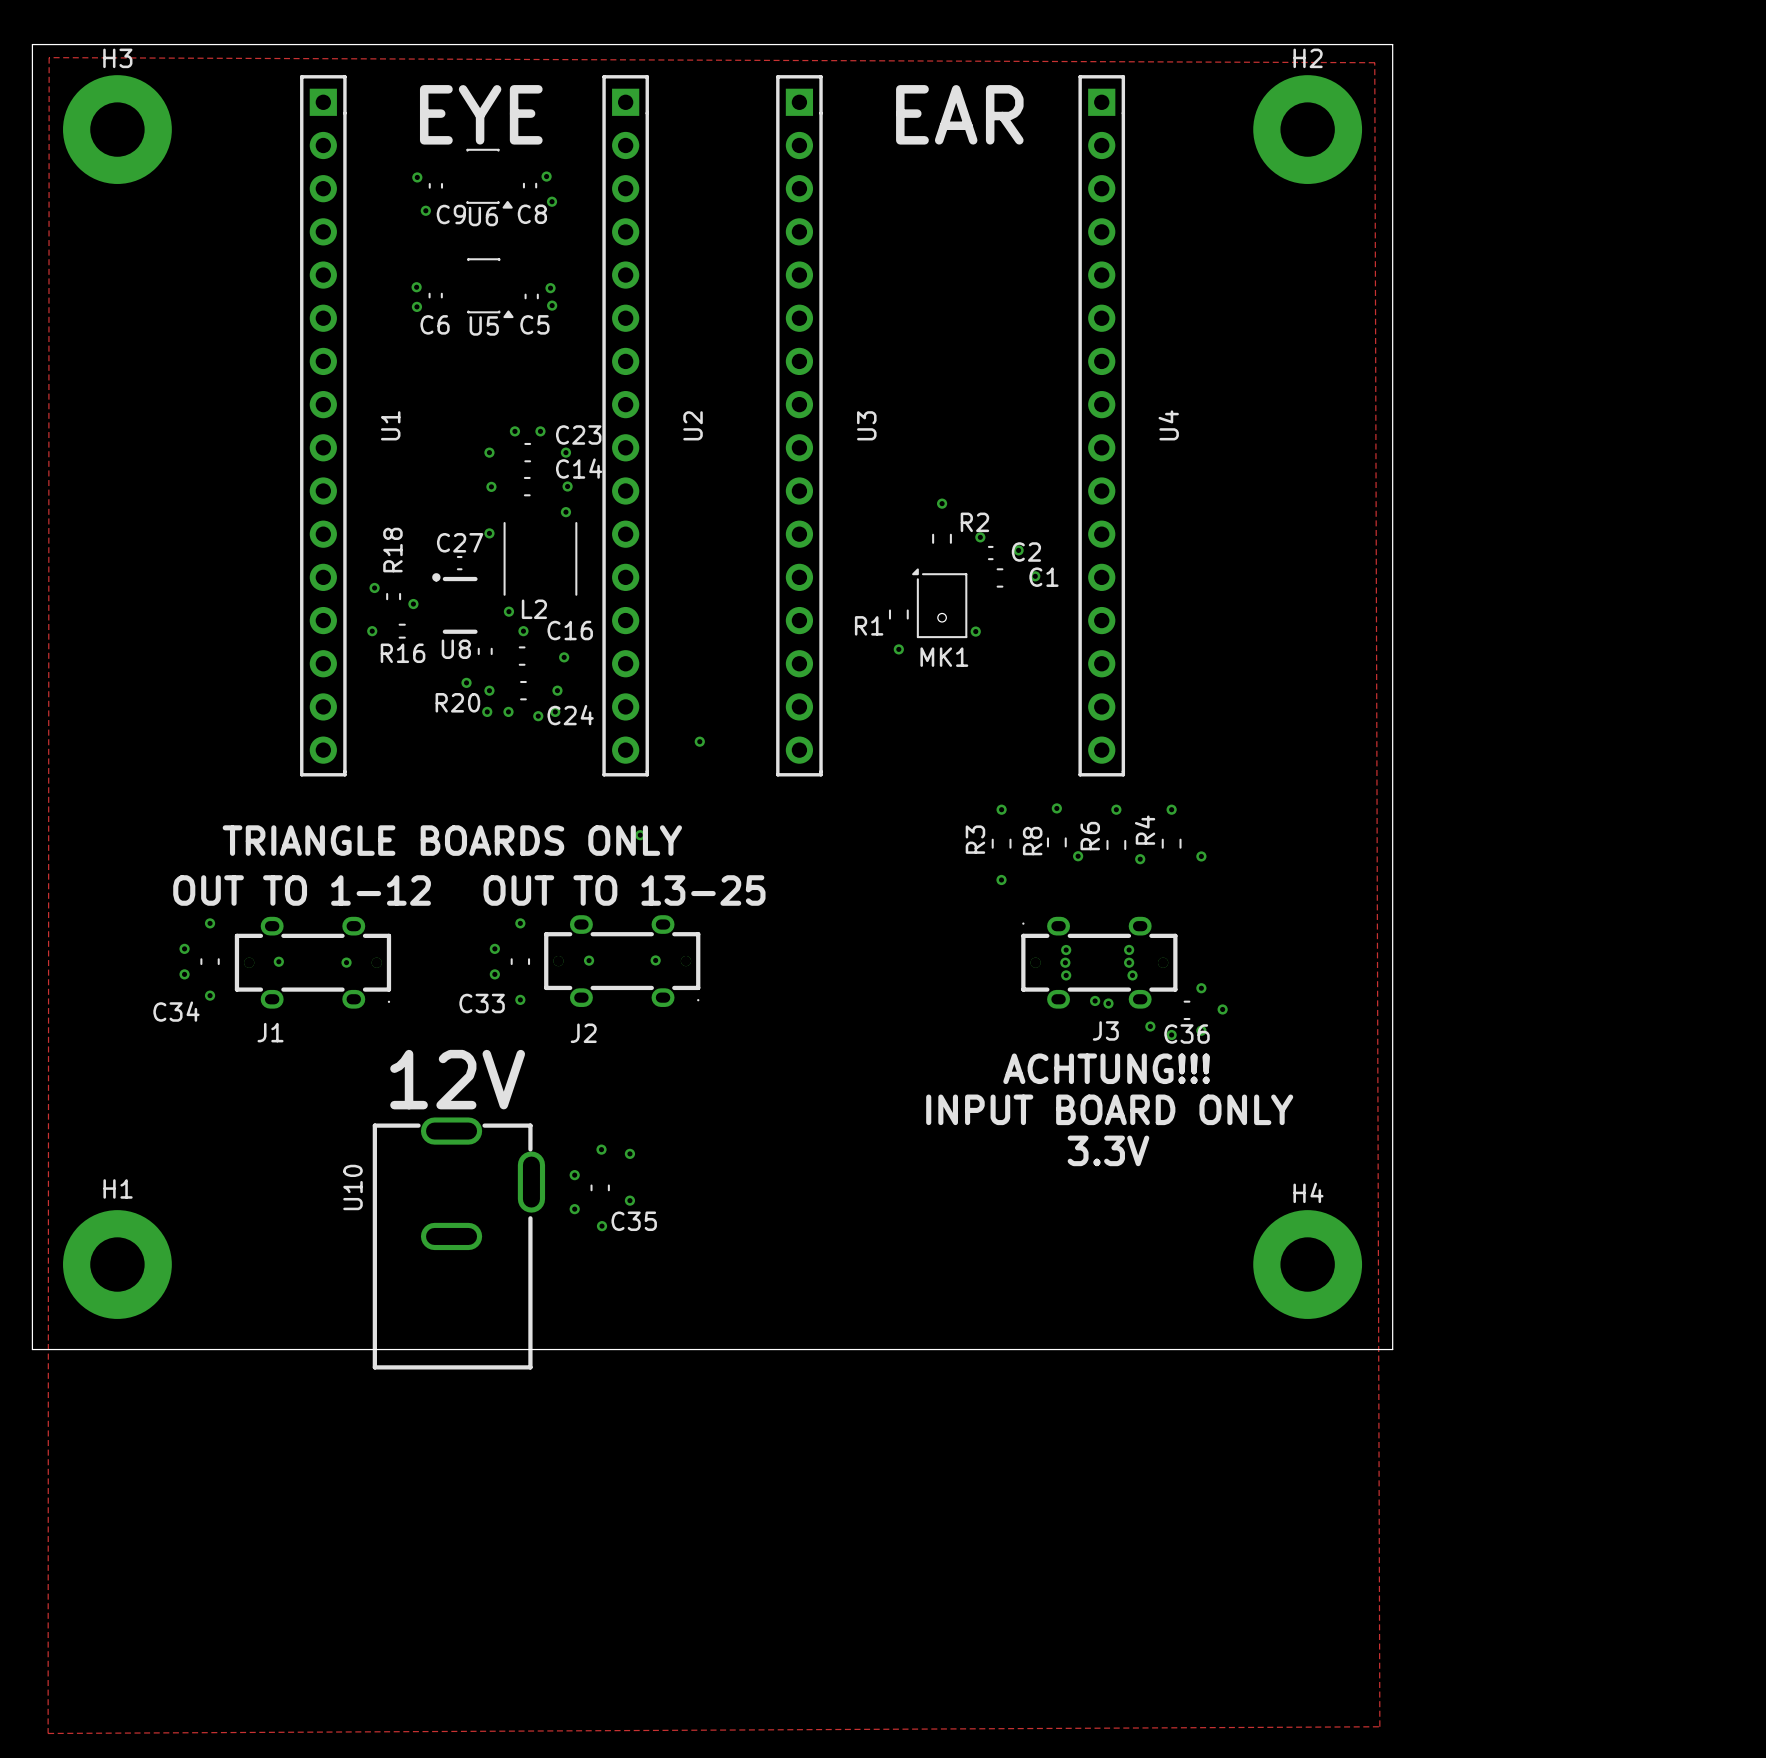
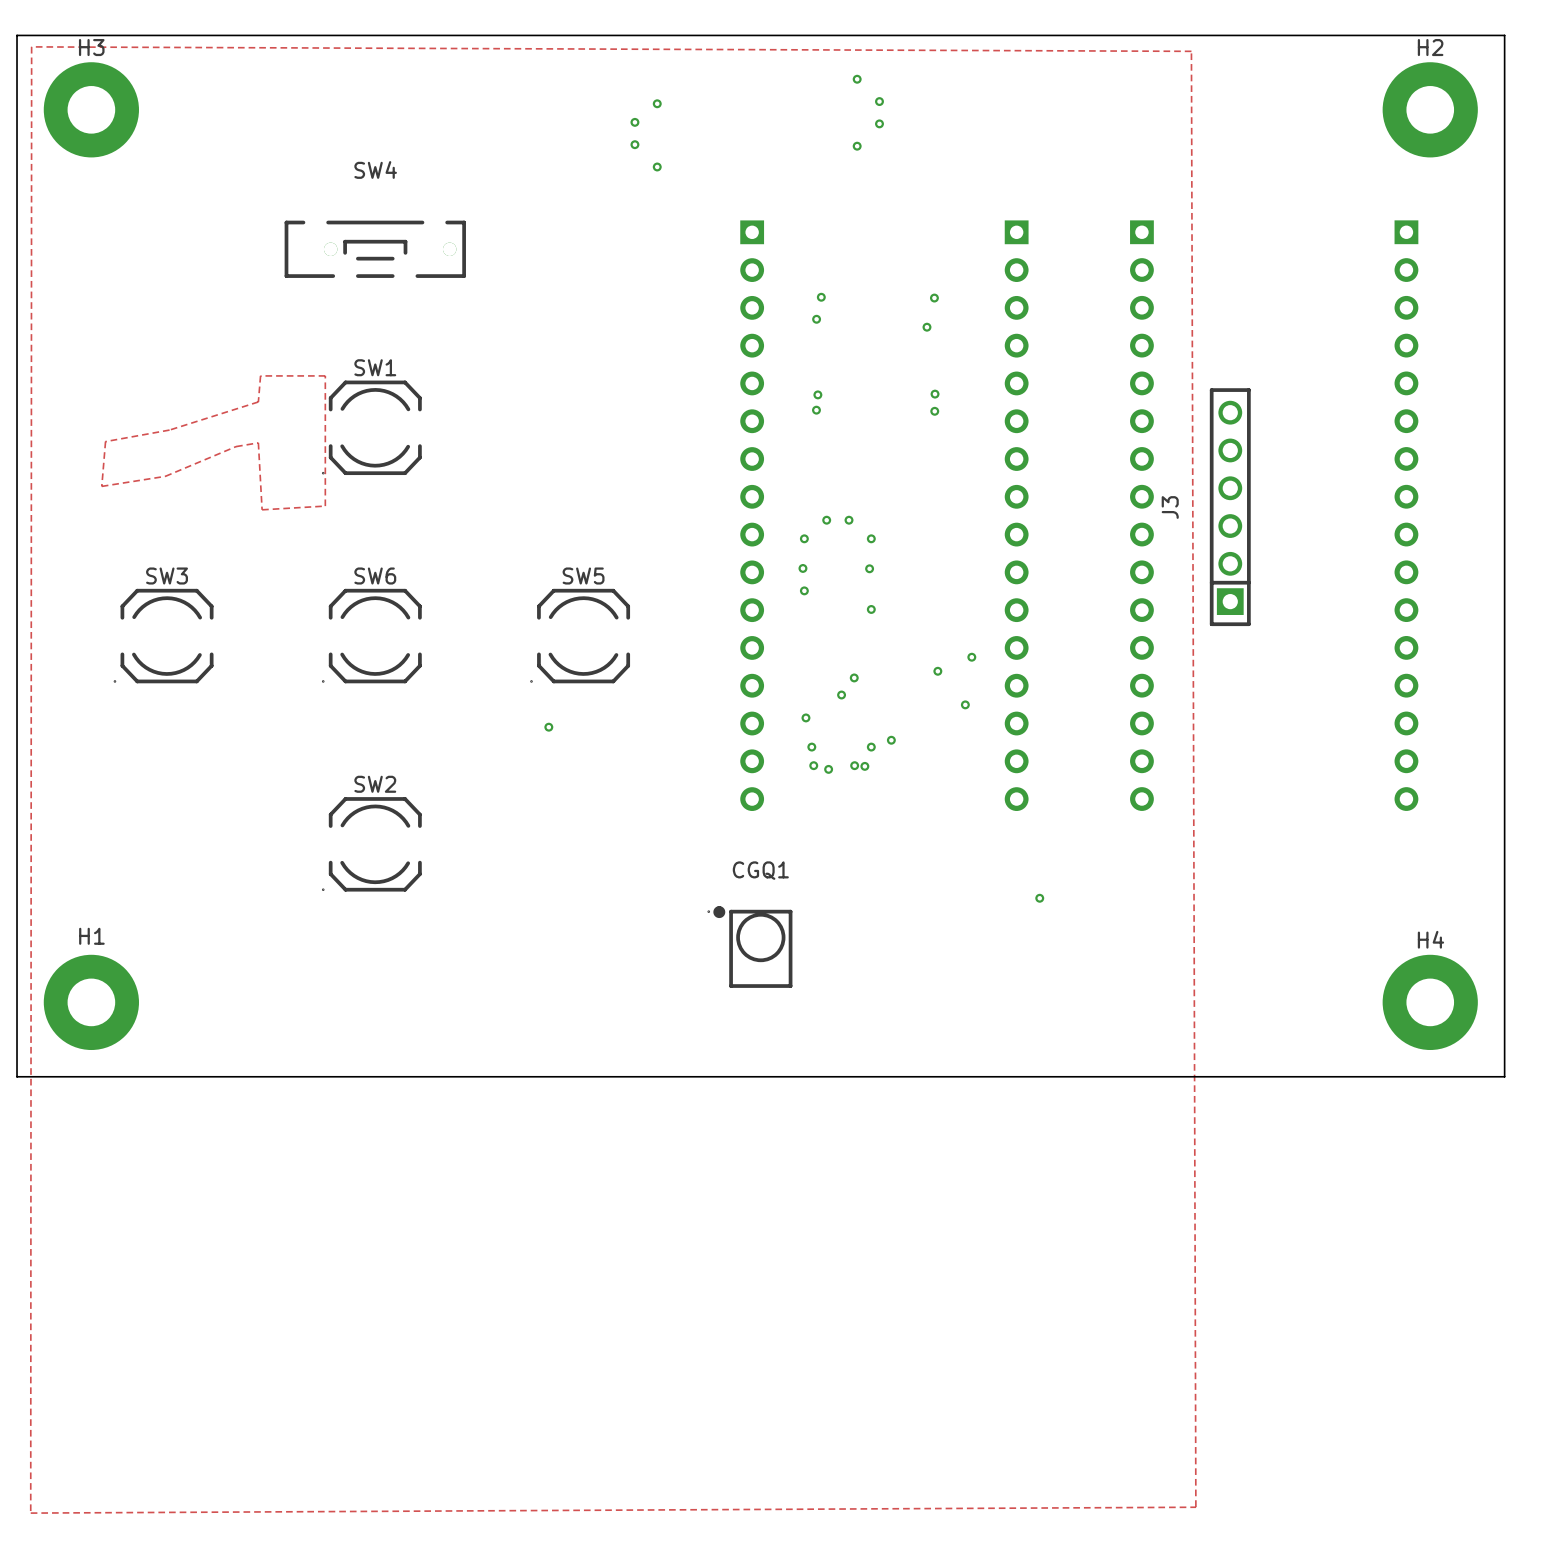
board edge: (1392, 44) (1392, 1349) (32, 1349) (32, 1234) -> (1207, 35) (1504, 35) (1504, 1076) (17, 1076)
via: none -> (857, 79)
text: EYE (481, 114) -> none
text: EAR (959, 114) -> none
via: none -> (879, 101)
via: none -> (657, 103)
H2 position: (1307, 129) -> (1430, 109)
via: none -> (634, 122)
via: none -> (879, 123)
via: none -> (634, 144)
via: none -> (857, 146)
via: (546, 176) -> none
via: (417, 177) -> none
U6: (489, 178) -> none
C9: (435, 185) -> none
C8: (530, 185) -> none
via: none -> (657, 166)
via: (552, 201) -> none
via: (425, 210) -> none
via: (416, 287) -> none
SW4: none -> (375, 249)
U5: (490, 288) -> none
via: (550, 288) -> none
C6: (435, 295) -> none
C5: (531, 296) -> none
via: (552, 305) -> none
via: (416, 306) -> none
via: none -> (821, 297)
via: none -> (934, 298)
via: none -> (816, 319)
via: none -> (926, 327)
U1: (323, 425) -> none
U2 side: top (625, 425) -> bottom (752, 515)
U3: (799, 425) -> none
U4 side: top (1101, 425) -> bottom (1141, 515)
via: (514, 431) -> none
via: (540, 431) -> none
zone outline: none -> (260, 375) (325, 375) (325, 506) (262, 509) (258, 442) (236, 446) (165, 476) (101, 486) (105, 441) (169, 430) (258, 401) (260, 375)
via: (489, 452) -> none
C23: (527, 452) -> none
via: (565, 452) -> none
via: none -> (935, 394)
via: none -> (817, 394)
via: none -> (816, 410)
via: none -> (934, 411)
via: (491, 486) -> none
C14: (527, 486) -> none
via: (567, 486) -> none
SW1: none -> (372, 427)
via: (942, 503) -> none
via: (565, 512) -> none
via: (489, 533) -> none
via: (980, 537) -> none
R2: (942, 538) -> none
via: (1018, 550) -> none
C2: (990, 553) -> none
L2: (540, 558) -> none
C27: (459, 563) -> none
via: (1035, 576) -> none
C1: (1000, 577) -> none
via: (374, 587) -> none
part: none -> (1016, 515)
part: none -> (1406, 515)
R18: (393, 596) -> none
via: none -> (826, 520)
via: none -> (849, 520)
U8: (454, 603) -> none
MK1: (939, 603) -> none
via: (413, 604) -> none
via: (508, 611) -> none
R1: (898, 614) -> none
via: none -> (804, 538)
via: none -> (871, 538)
via: (372, 631) -> none
R16: (402, 631) -> none
via: (523, 631) -> none
via: (975, 631) -> none
via: (898, 649) -> none
R20: (485, 651) -> none
via: none -> (802, 568)
via: none -> (869, 568)
C16: (522, 656) -> none
via: (564, 657) -> none
via: none -> (804, 590)
via: (466, 682) -> none
via: (489, 690) -> none
C24: (523, 690) -> none
via: (557, 690) -> none
via: none -> (871, 609)
via: (487, 711) -> none
via: (508, 711) -> none
via: (555, 711) -> none
via: (538, 716) -> none
SW3: none -> (163, 636)
SW6: none -> (372, 636)
SW5: none -> (580, 636)
via: (699, 741) -> none
via: none -> (971, 657)
via: none -> (937, 671)
via: none -> (854, 677)
via: none -> (841, 695)
via: (1056, 808) -> none
via: (1001, 809) -> none
via: (1171, 809) -> none
via: none -> (805, 717)
text: TRIANGLE BOARDS ONLY (452, 840) -> none
R8: (1056, 842) -> none
R3: (1001, 843) -> none
R4: (1171, 843) -> none
R6: (1116, 844) -> none
via: none -> (891, 740)
via: (1078, 856) -> none
via: (1201, 856) -> none
via: none -> (811, 747)
via: none -> (871, 747)
via: (1140, 859) -> none
via: none -> (813, 765)
via: none -> (854, 765)
via: none -> (828, 769)
text: OUT TO 1-12 (302, 890) -> none
text: OUT TO 13-25 (624, 890) -> none
J3 footprint: [1021, 916, 1178, 1009] -> [1209, 388, 1251, 627]
via: (210, 923) -> none
via: (520, 923) -> none
via: (184, 948) -> none
via: (494, 948) -> none
via: (1129, 949) -> none
via: (1066, 950) -> none
via: (589, 960) -> none
via: (655, 960) -> none
C34: (210, 961) -> none
via: (278, 961) -> none
C33: (520, 961) -> none
J2: (622, 961) -> none
J1: (312, 962) -> none
via: (346, 962) -> none
via: (1065, 962) -> none
via: (1129, 962) -> none
SW2: none -> (372, 844)
via: (184, 974) -> none
via: (494, 974) -> none
via: (1066, 975) -> none
via: (1132, 975) -> none
via: (1201, 988) -> none
via: (210, 995) -> none
via: (520, 999) -> none
via: (1095, 1000) -> none
via: (1108, 1003) -> none
via: (1222, 1009) -> none
C36: (1187, 1010) -> none
via: (1150, 1026) -> none
J3 name position: J3 (1105, 1030) -> J3 (1170, 507)
via: (1171, 1034) -> none
text: ACHTUNG!!! (1106, 1068) -> none
text: 12V (457, 1079) -> none
CGQ1: none -> (750, 947)
text: INPUT BOARD ONLY (1109, 1109) -> none
via: (601, 1149) -> none
text: 3.3V (1108, 1150) -> none
via: (629, 1153) -> none
via: (574, 1175) -> none
C35: (600, 1187) -> none
via: (629, 1200) -> none
via: (574, 1209) -> none
via: (602, 1226) -> none
U10: (458, 1243) -> none
H1 position: (117, 1264) -> (91, 1002)
H4 position: (1307, 1264) -> (1430, 1002)

